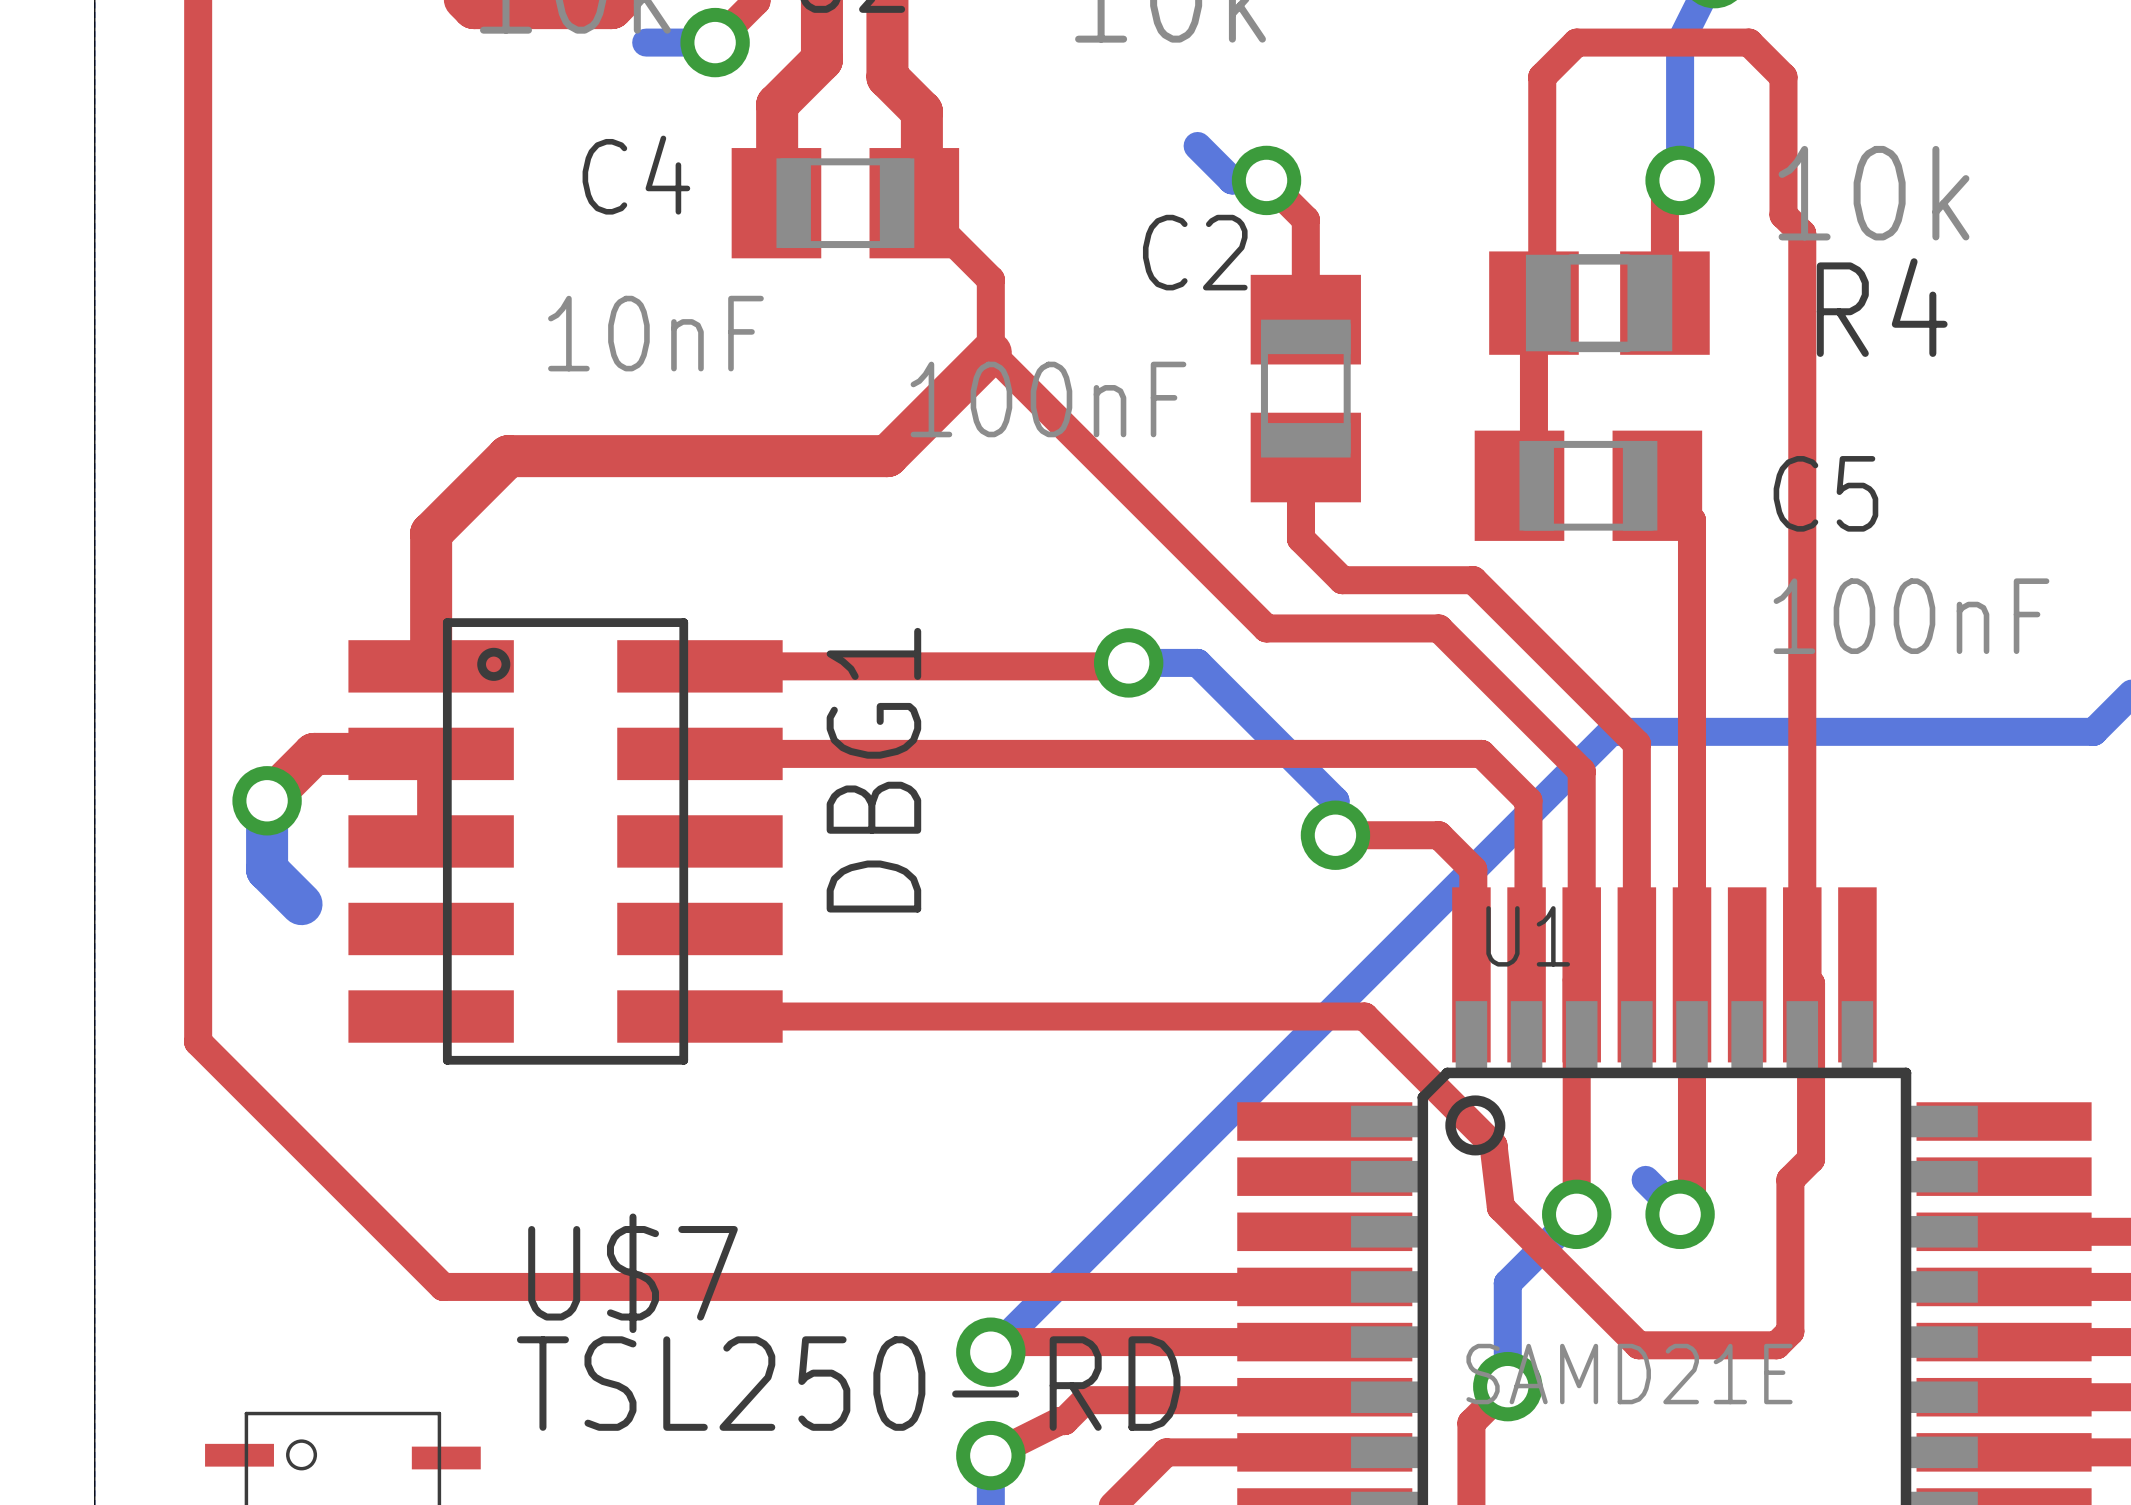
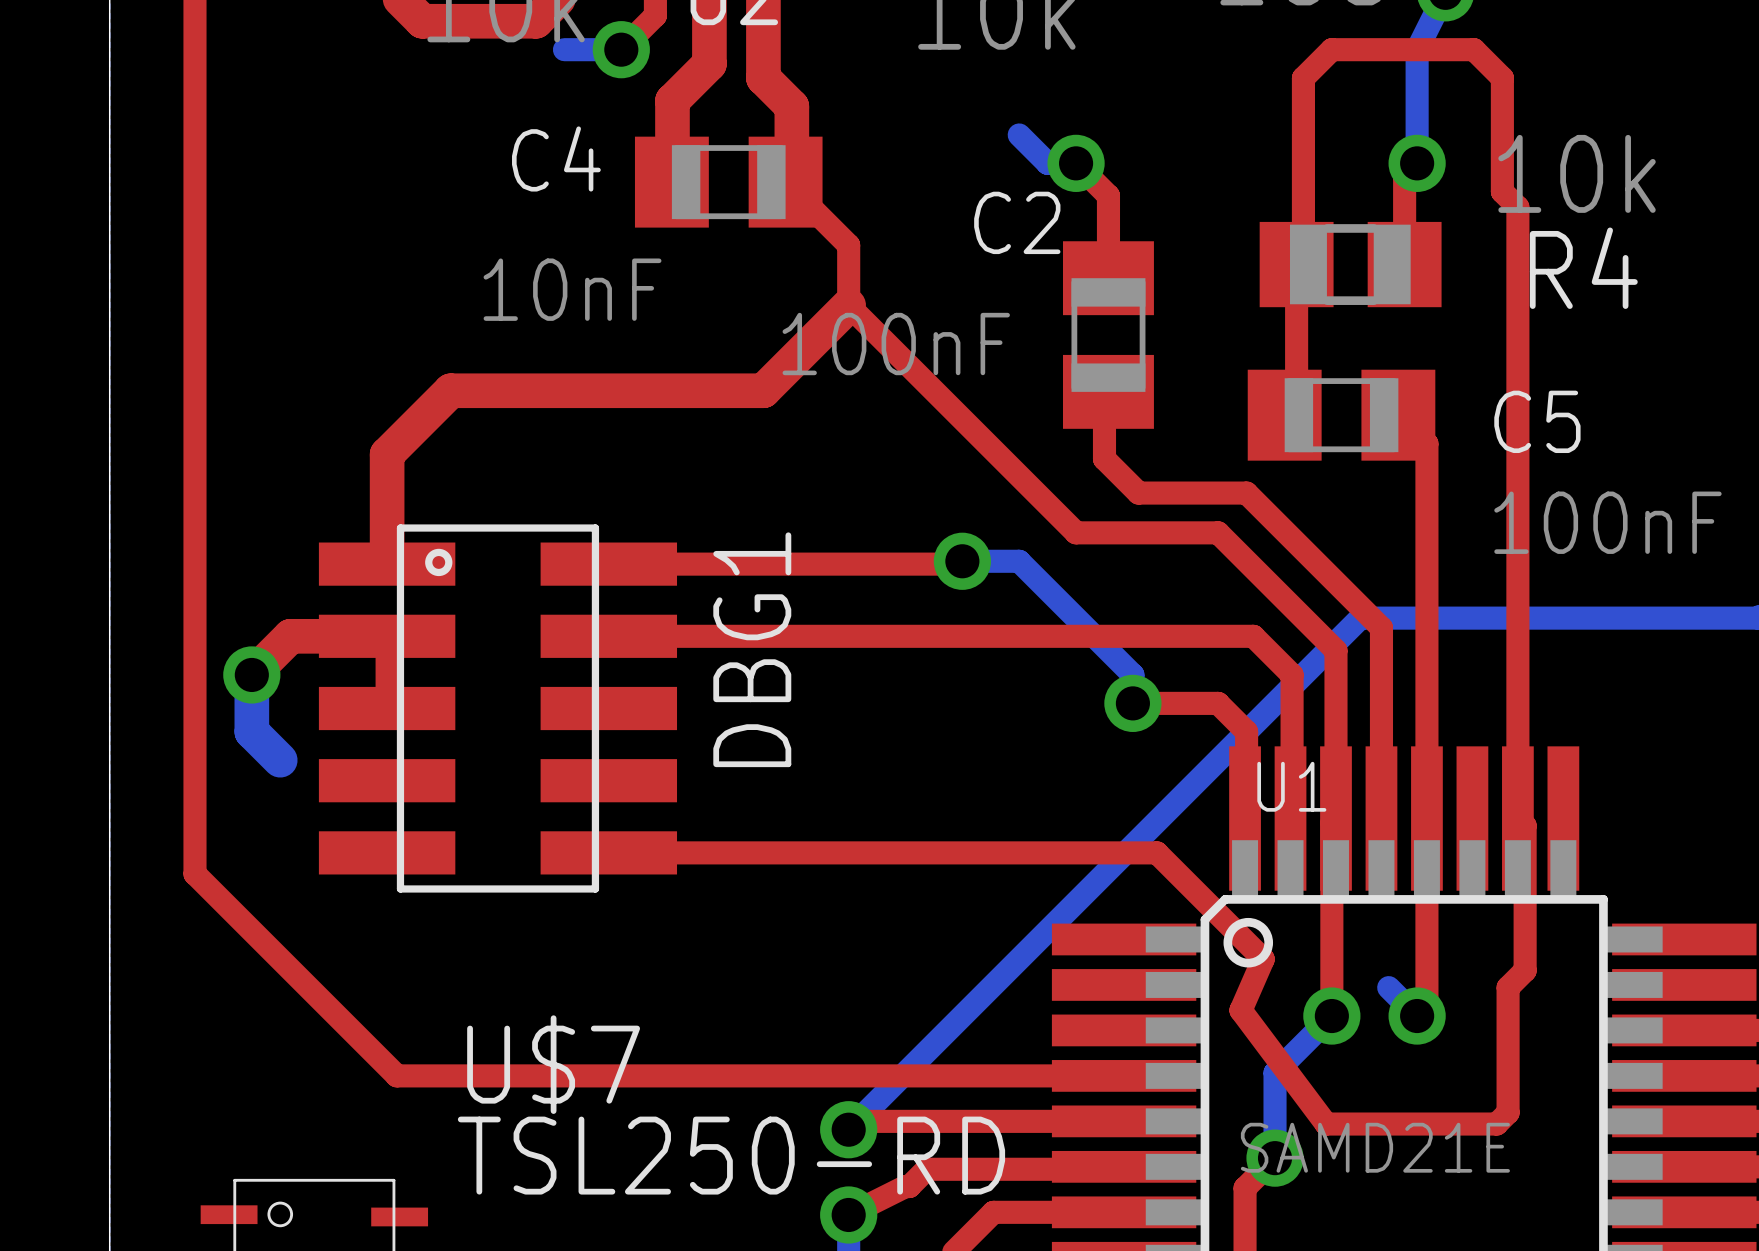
top track: (1493, 1145) (1500, 1207) (1638, 1345) -> (1263, 959) (1240, 1010) (1326, 1124) (1383, 1124)

